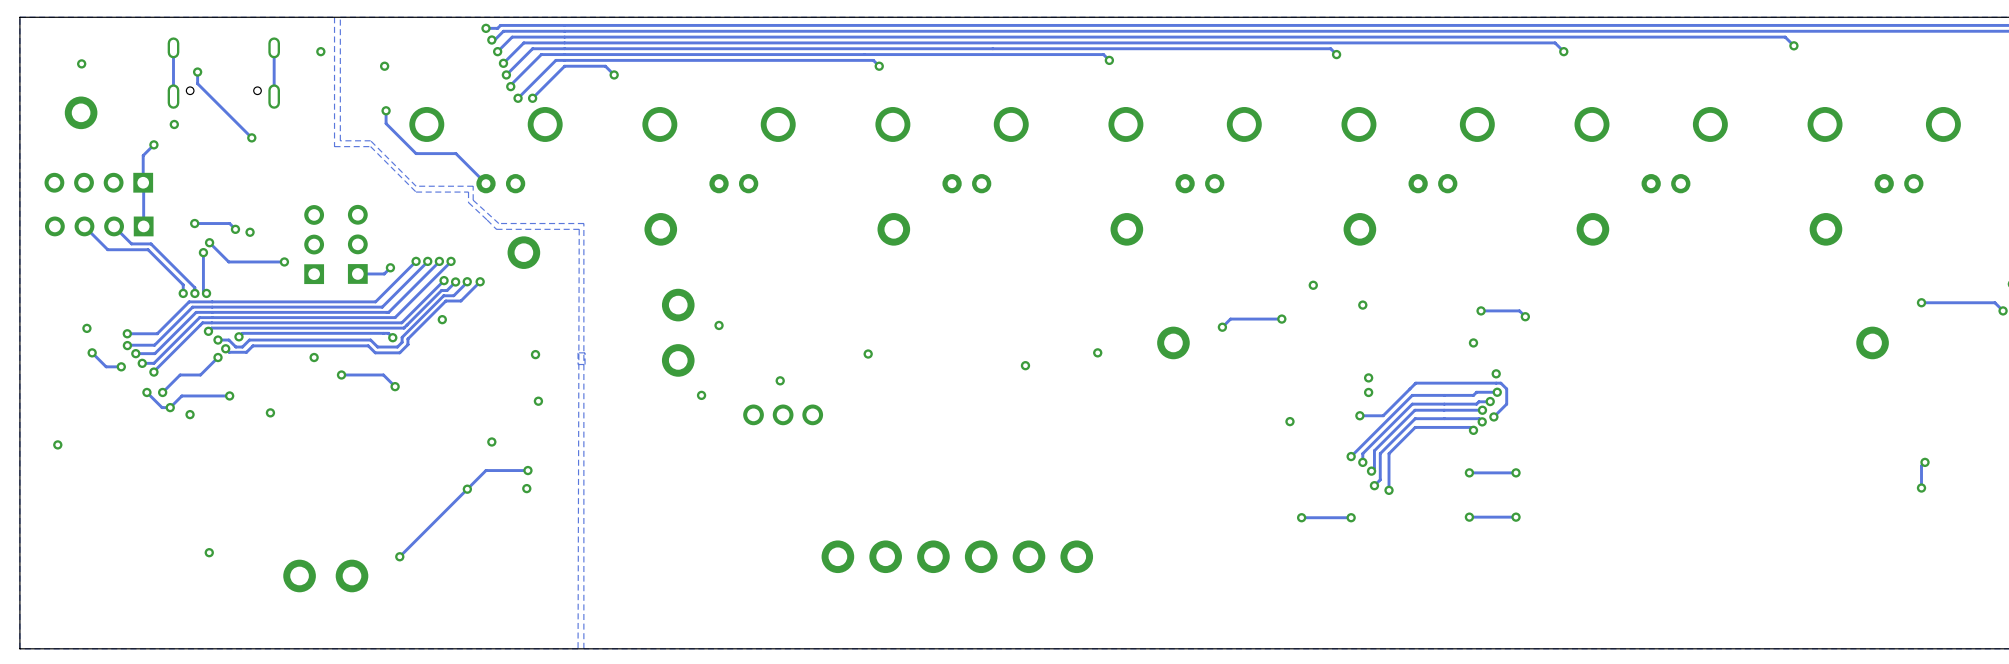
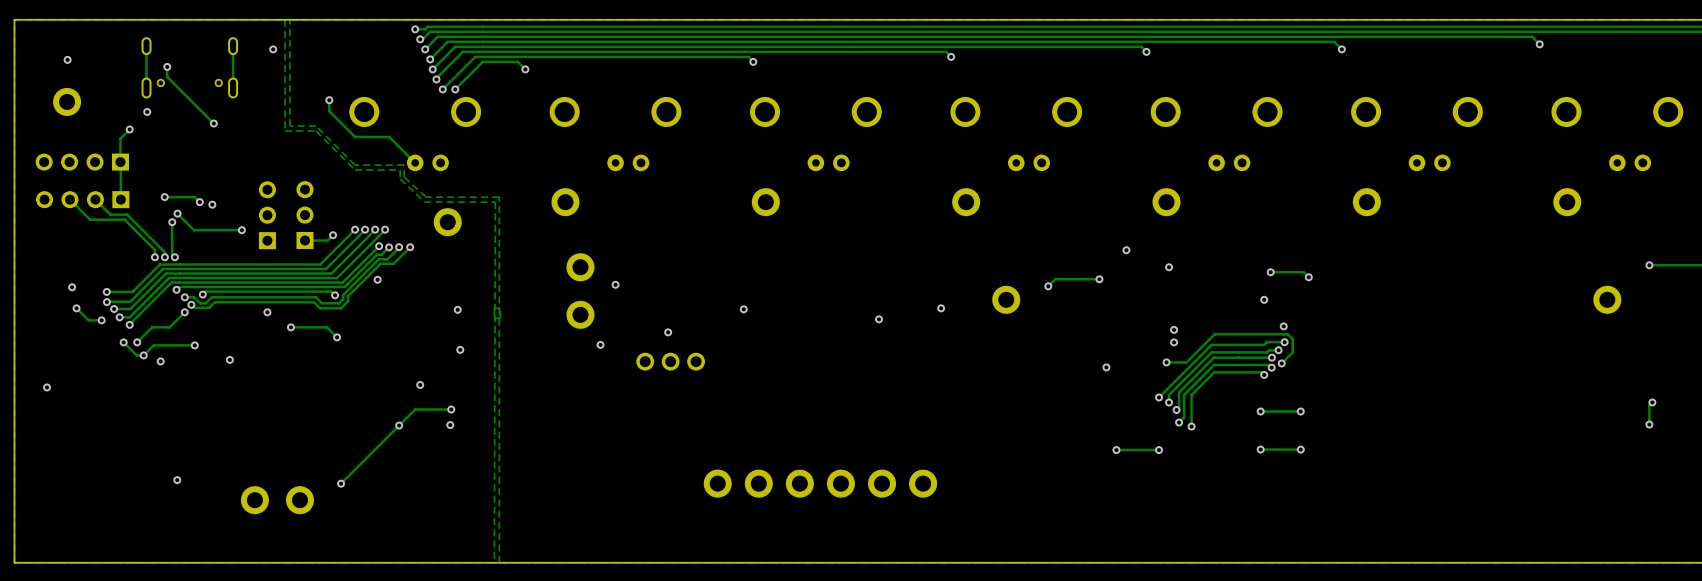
via: (384, 66) -> none

